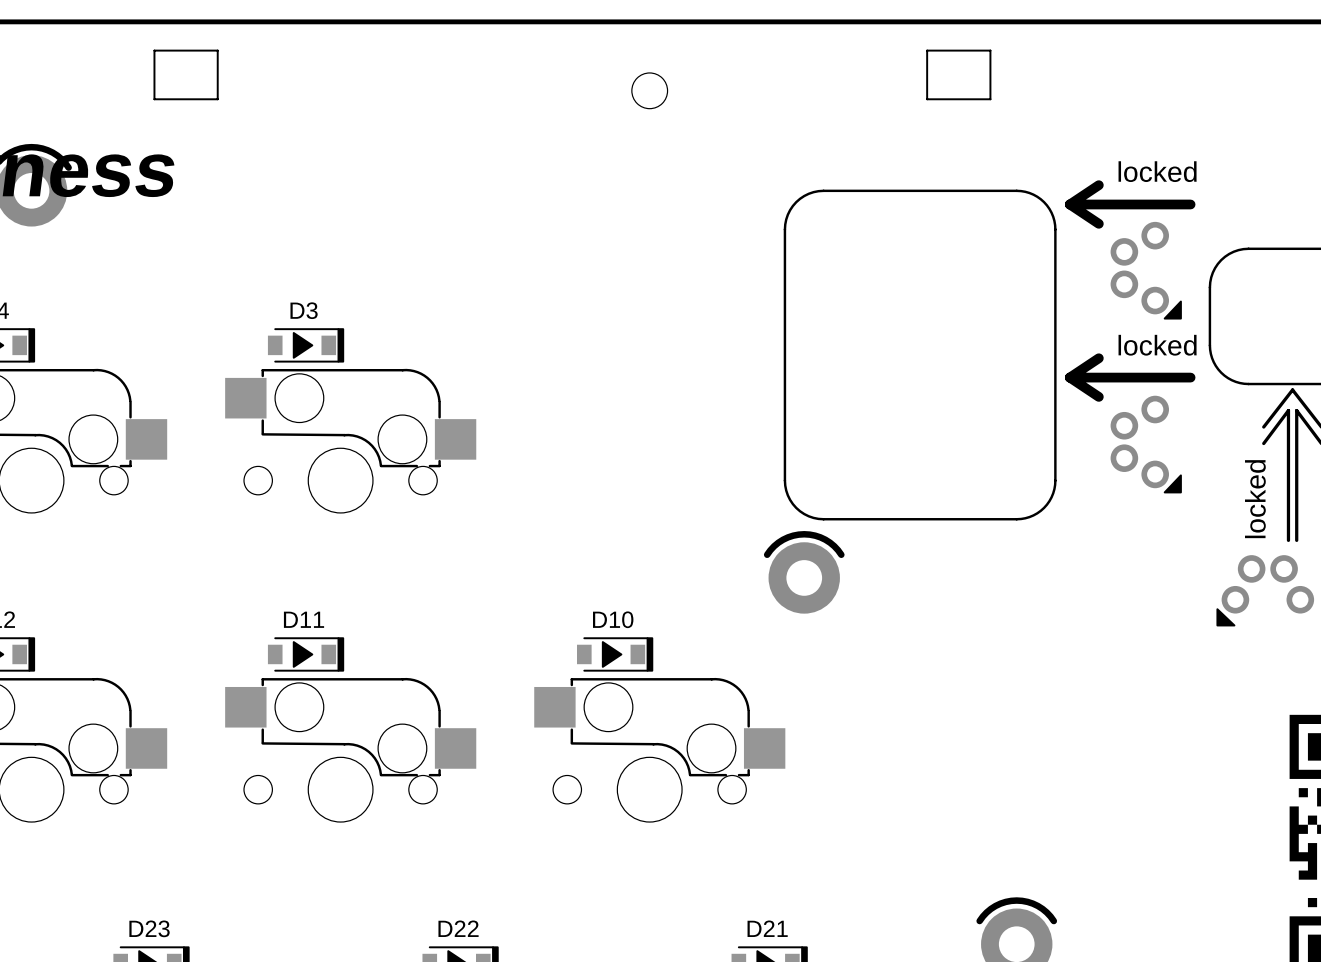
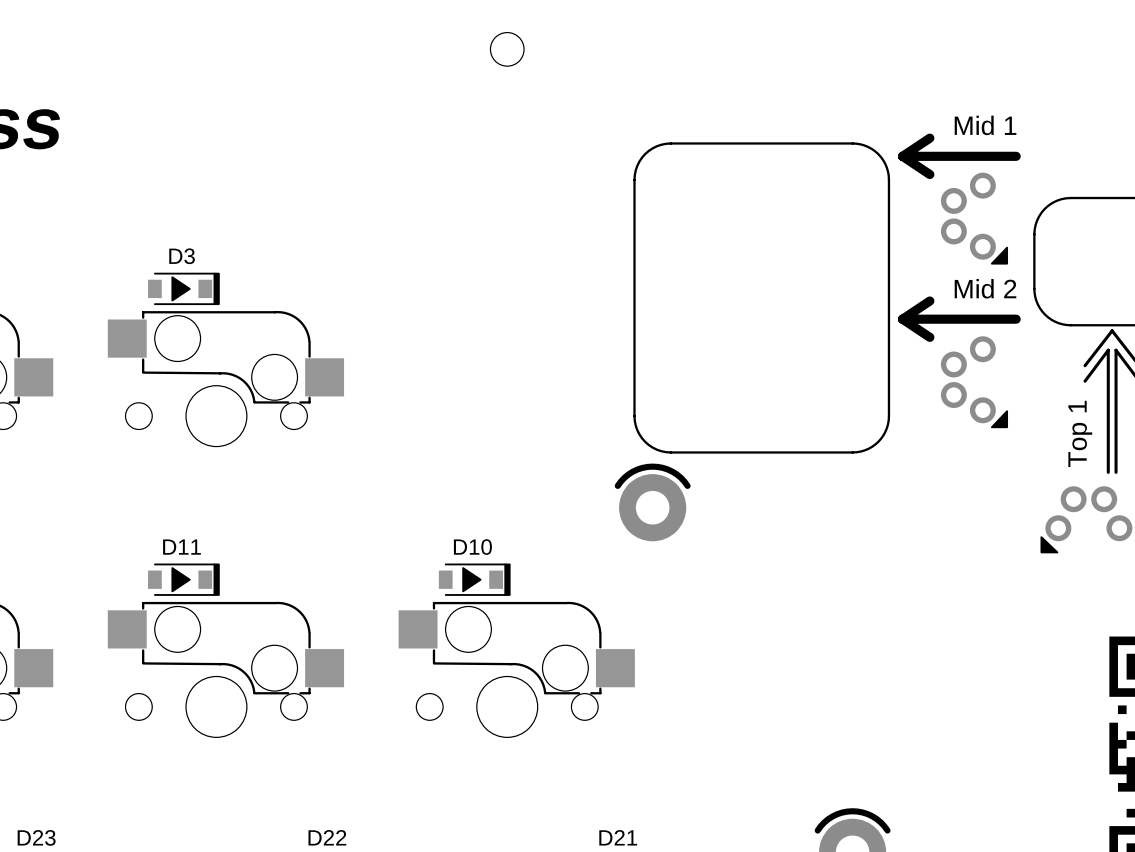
part: (186, 74) -> none
part: (958, 74) -> none
text: locked (1157, 171) -> Mid 1 (985, 125)
text: locked (1157, 345) -> Mid 2 (985, 288)
text: locked (1255, 499) -> Top 1 (1080, 433)

